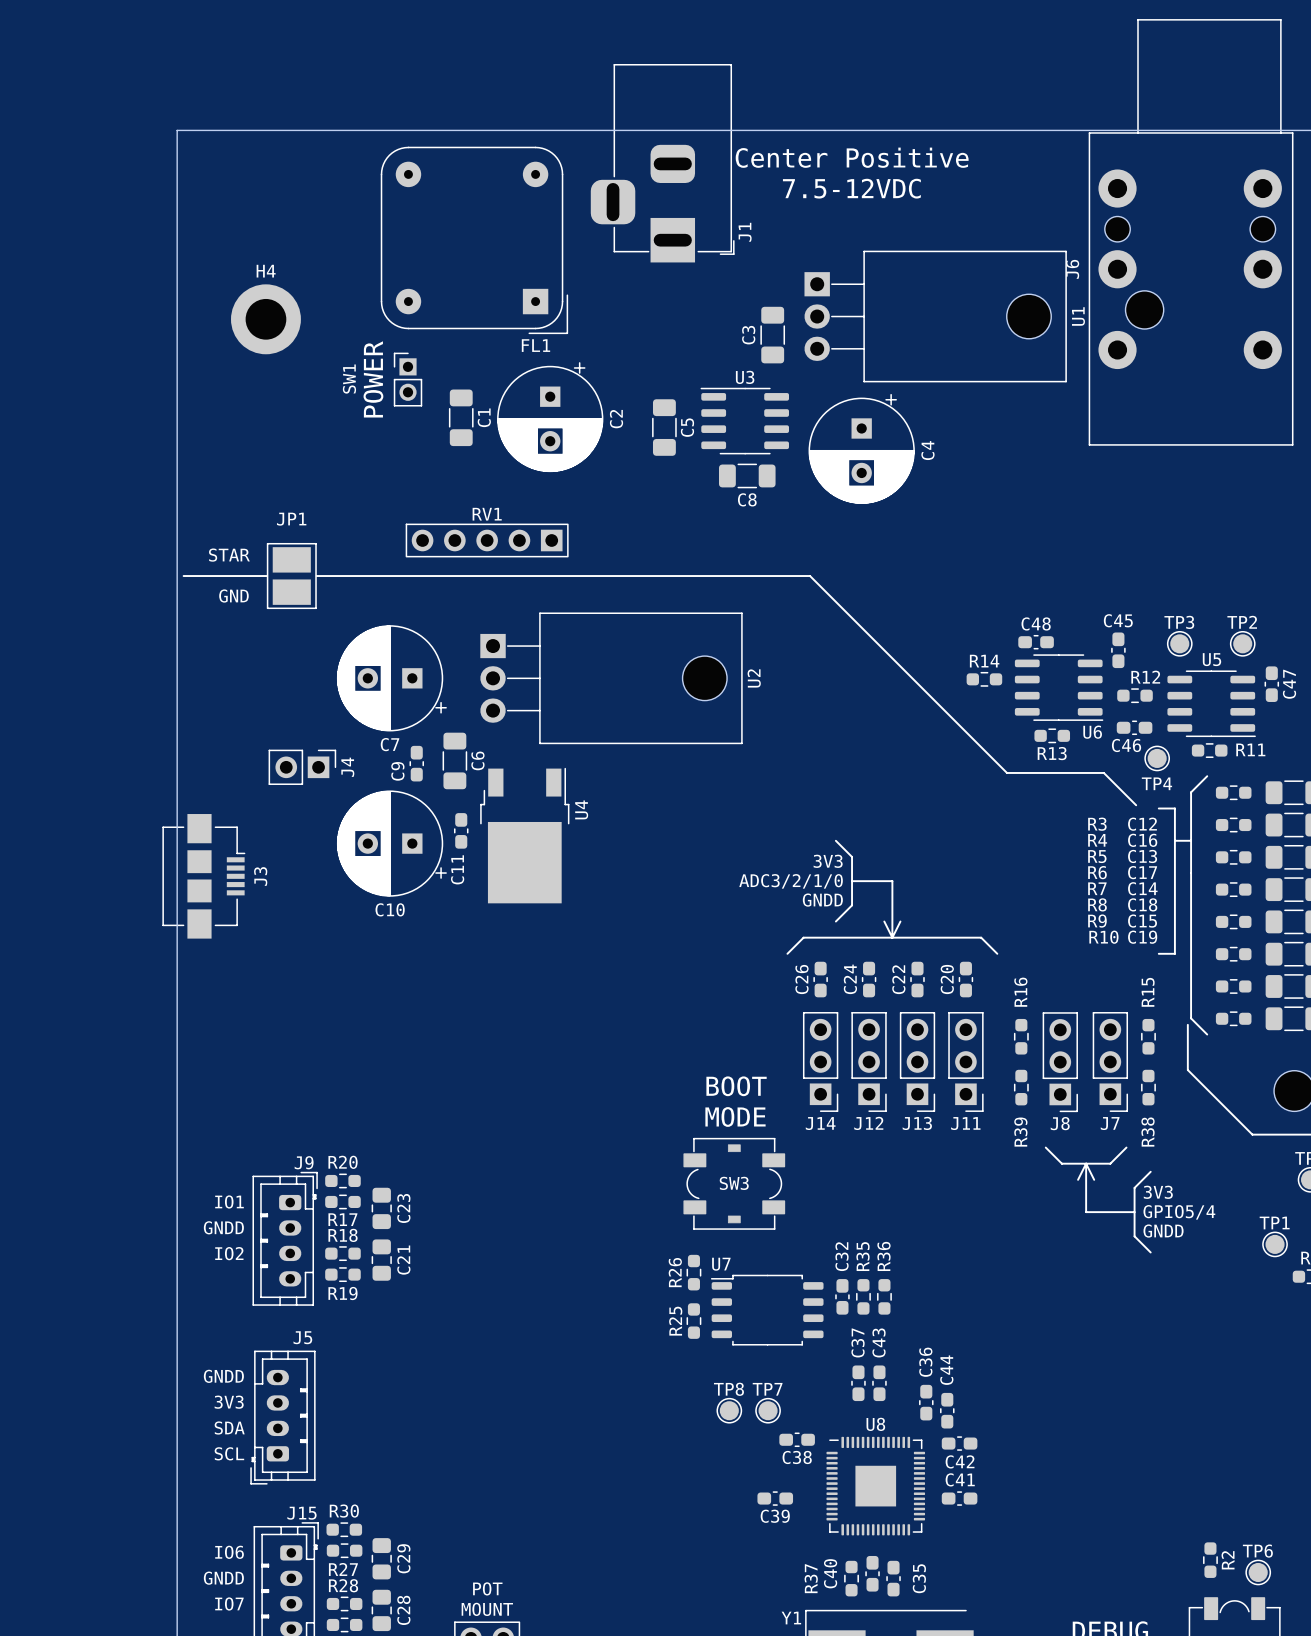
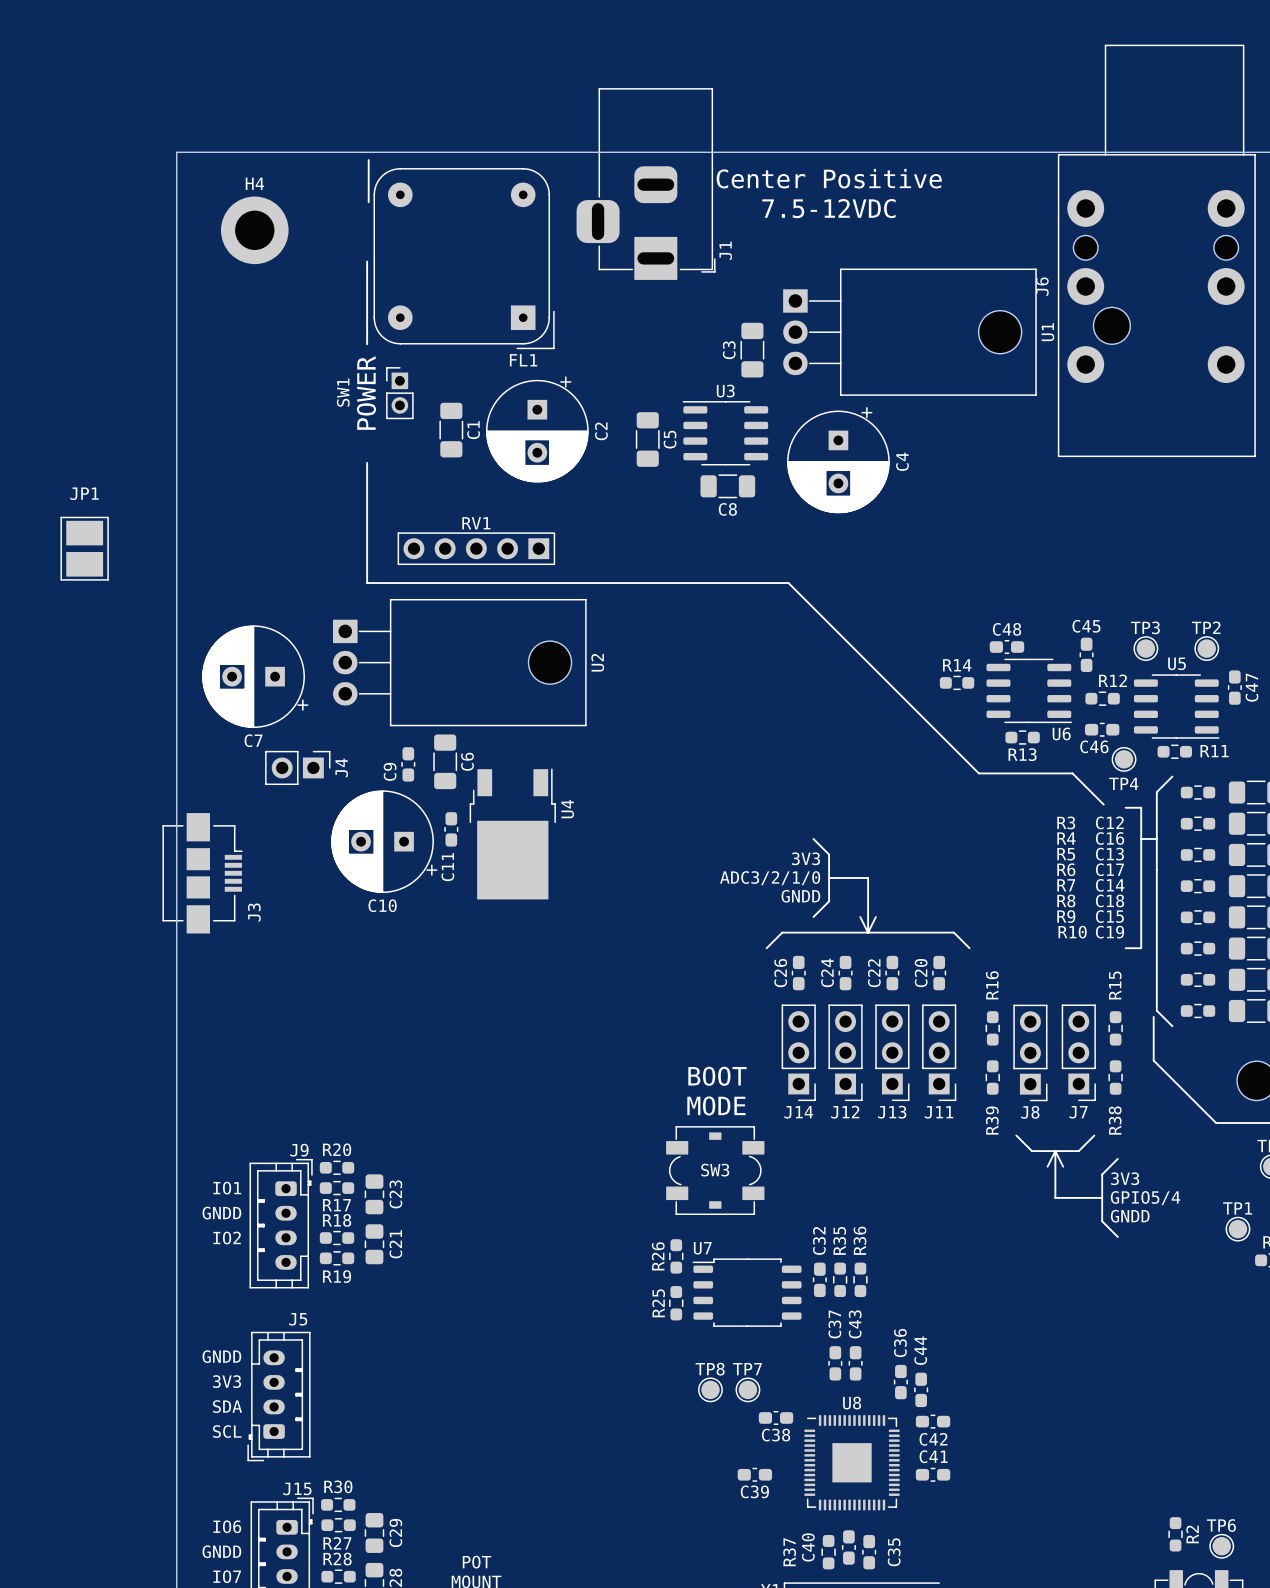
line: none -> (368, 160) (368, 202)
line: none -> (367, 261) (367, 344)
H4 position: (265, 319) -> (254, 230)
text: STAR (229, 555) -> none
line: (183, 576) (266, 576) -> none
JP1 position: (291, 576) -> (84, 548)
line: (316, 576) (374, 576) -> (367, 462) (367, 583)
text: GND (233, 596) -> none
C7 position: (391, 678) -> (255, 676)
U2 position: (611, 678) -> (459, 662)
J3 name position: J3 (260, 876) -> J3 (254, 912)

